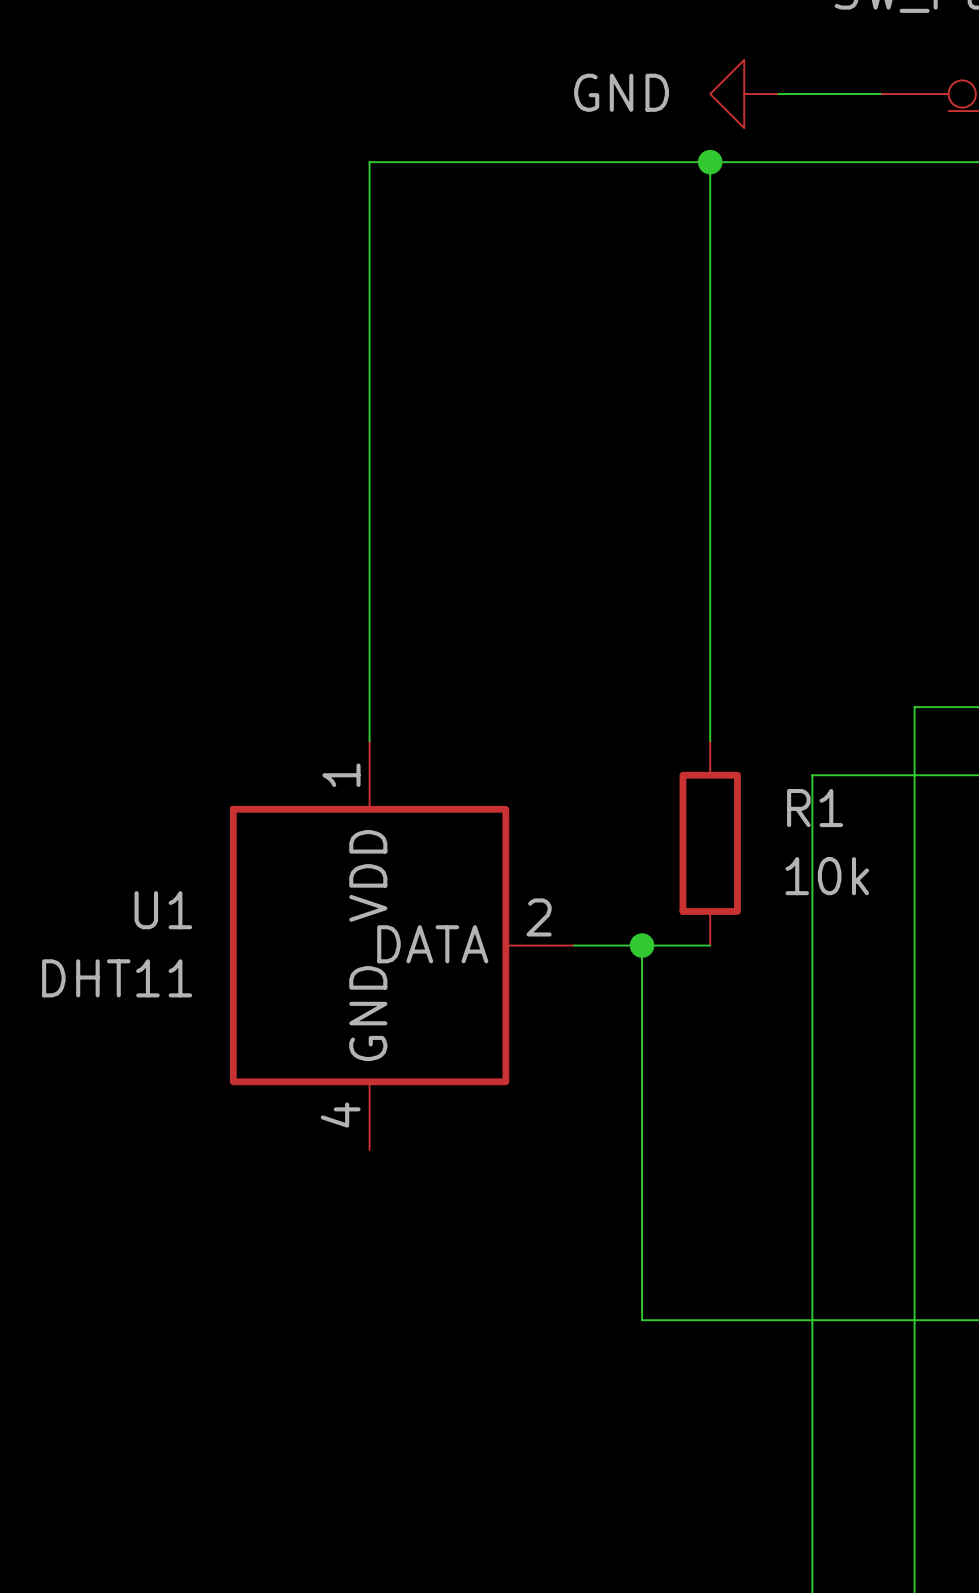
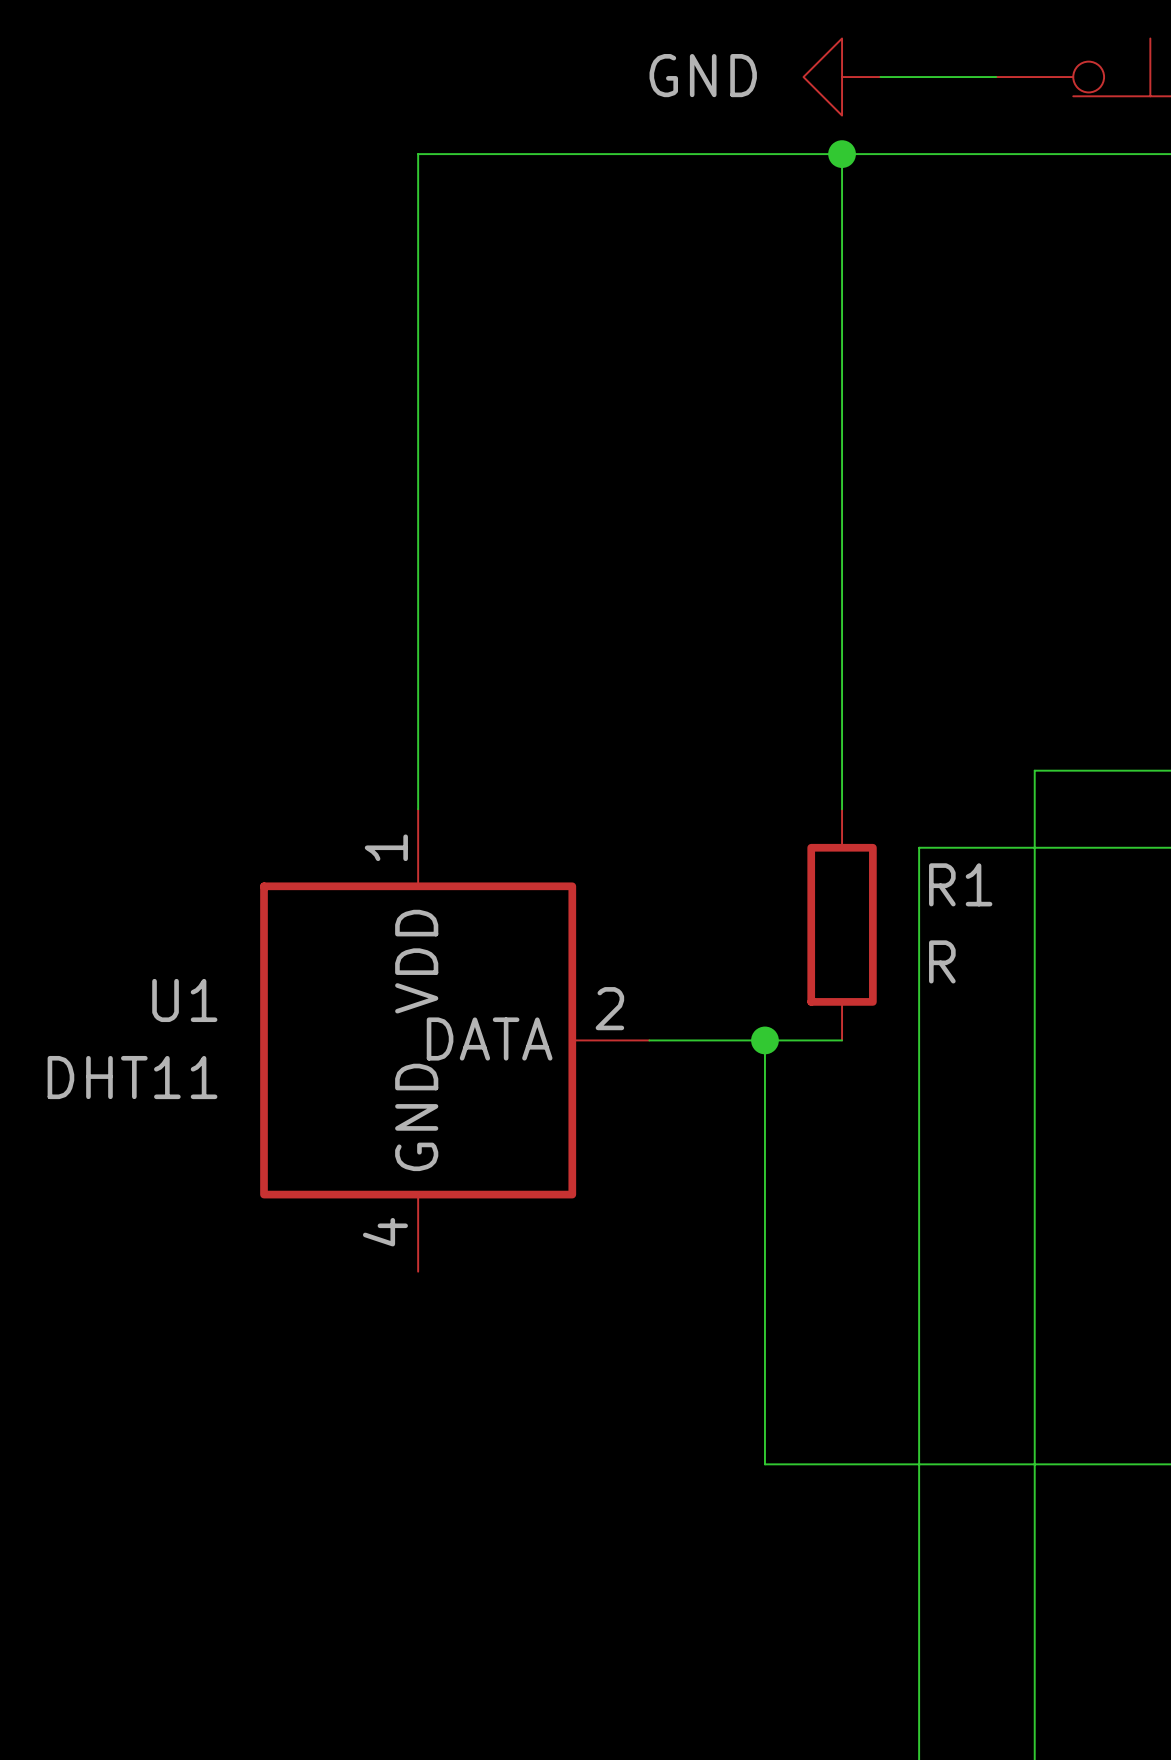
wire: (710, 162) (710, 741) -> (842, 154) (842, 809)
junction position: (710, 162) -> (842, 154)
R1 position: (710, 843) -> (842, 924)
R1 value: 10k (827, 876) -> R (942, 961)
wire: (642, 945) (642, 1320) (676, 1320) -> (764, 1040) (764, 1464)
junction position: (642, 945) -> (764, 1040)
wire: none -> (803, 1040) (842, 1040)

